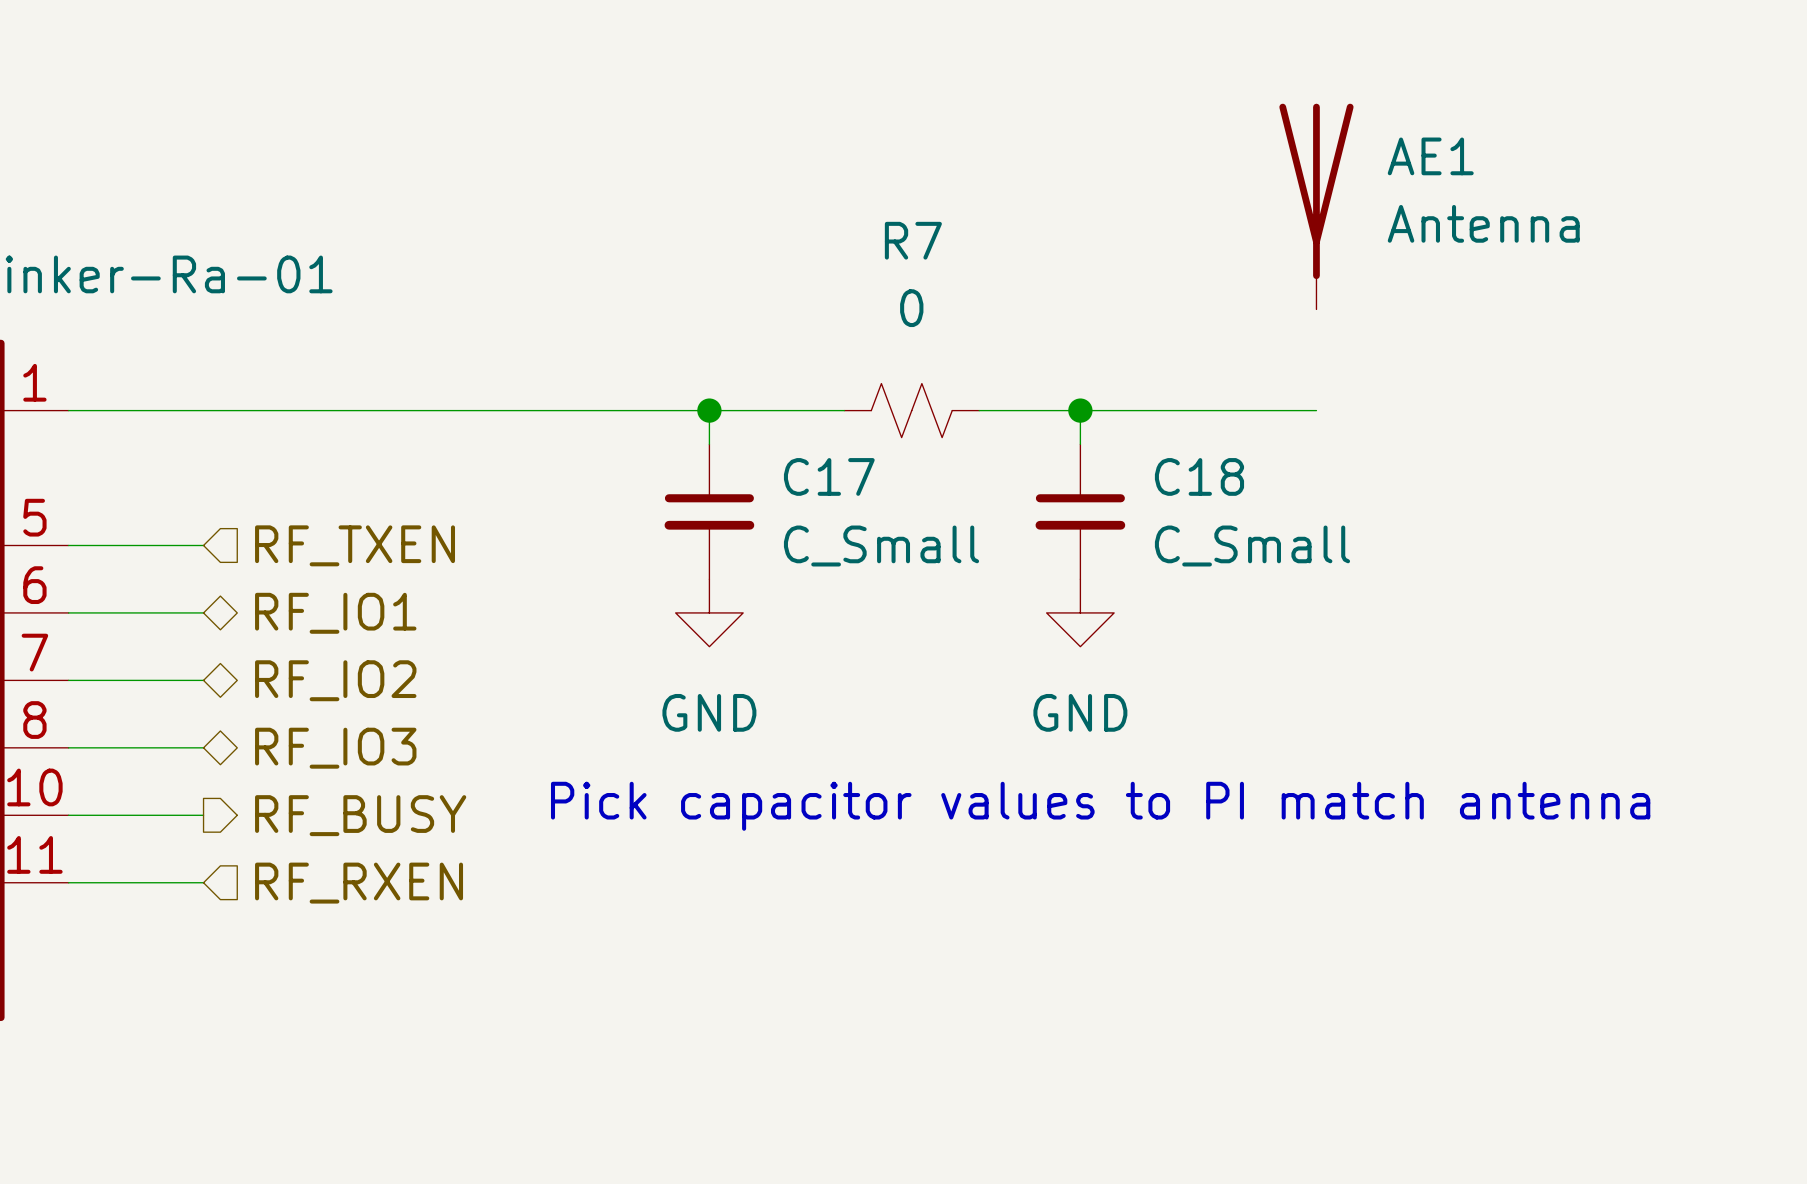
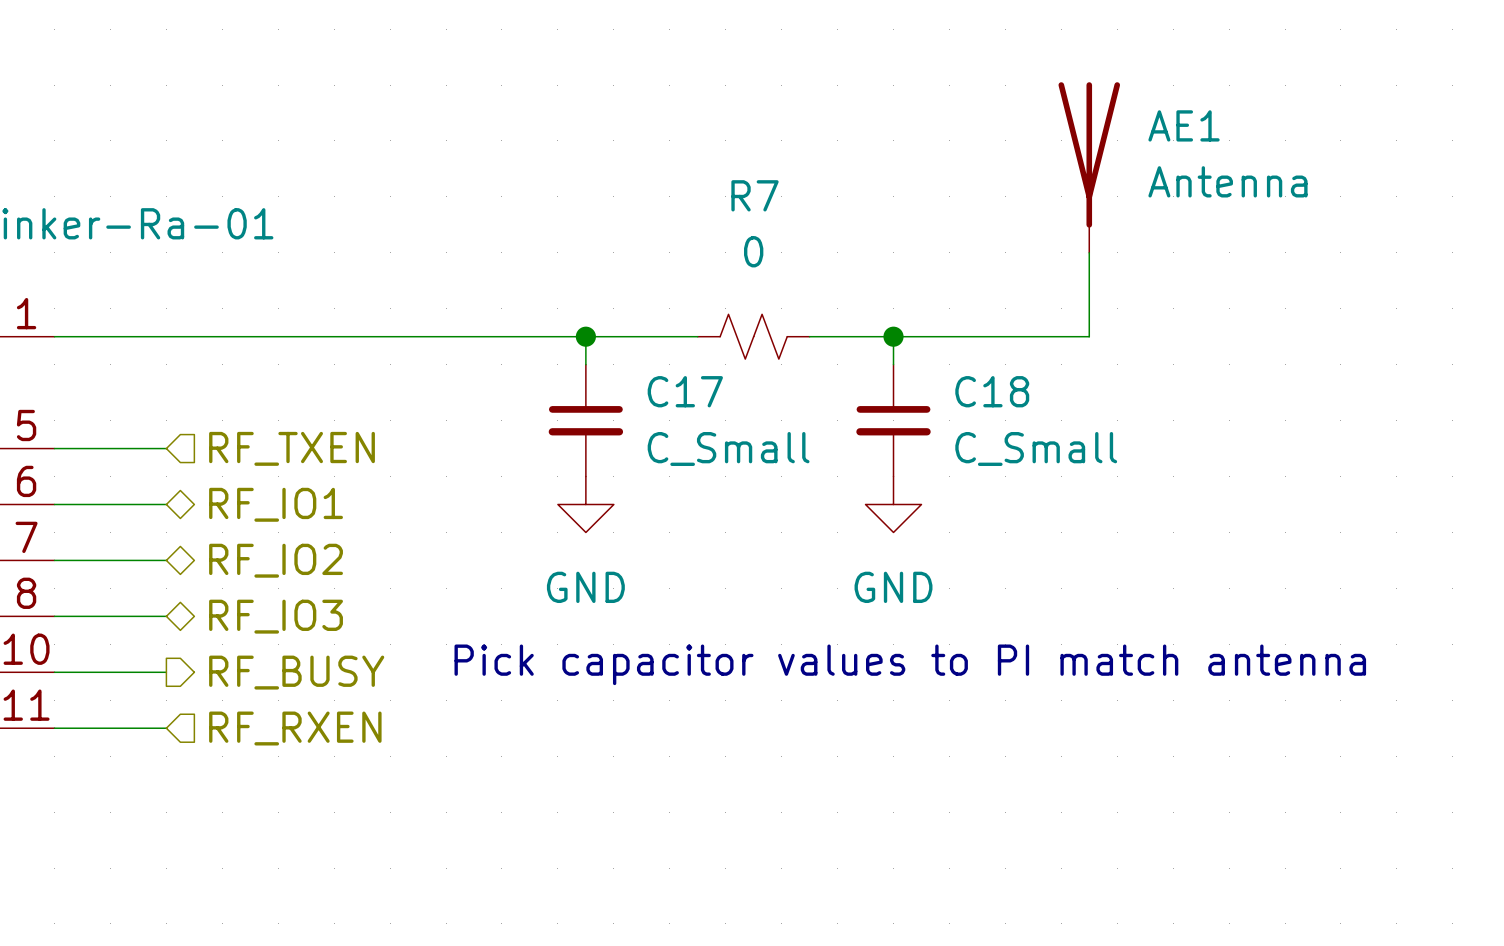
wire: none -> (1089, 252) (1089, 336)

